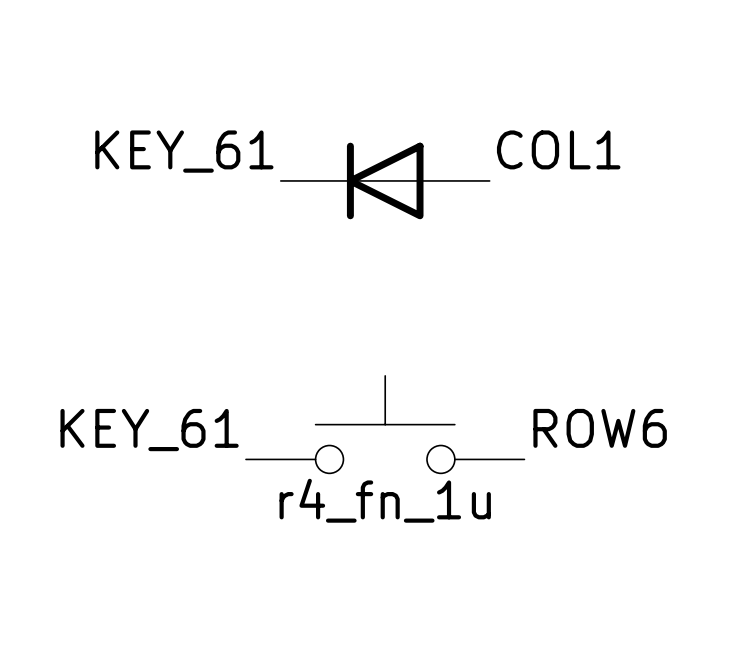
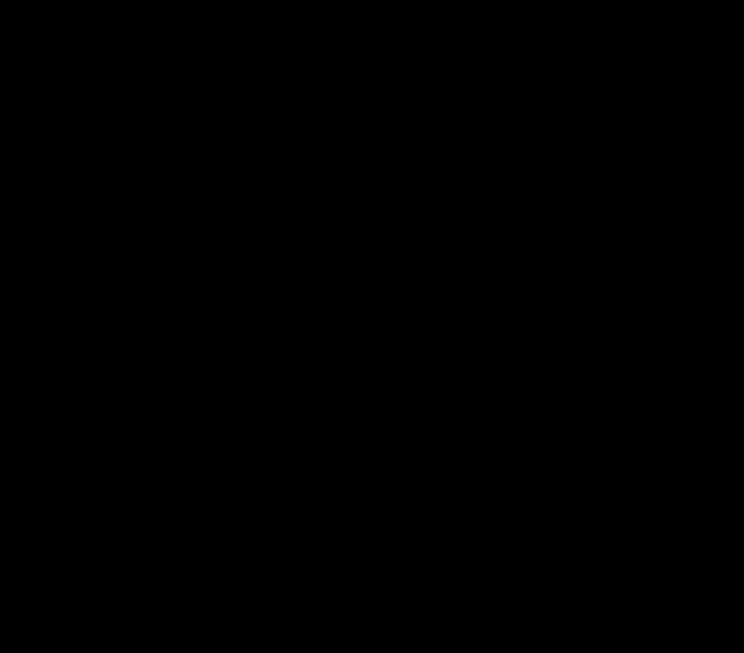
label: COL1 (558, 149) -> none
label: KEY_61 (184, 151) -> none
part: (385, 180) -> none
part: r4_fn_1u (385, 424) -> none
label: ROW6 (600, 428) -> none
label: KEY_61 (149, 430) -> none

